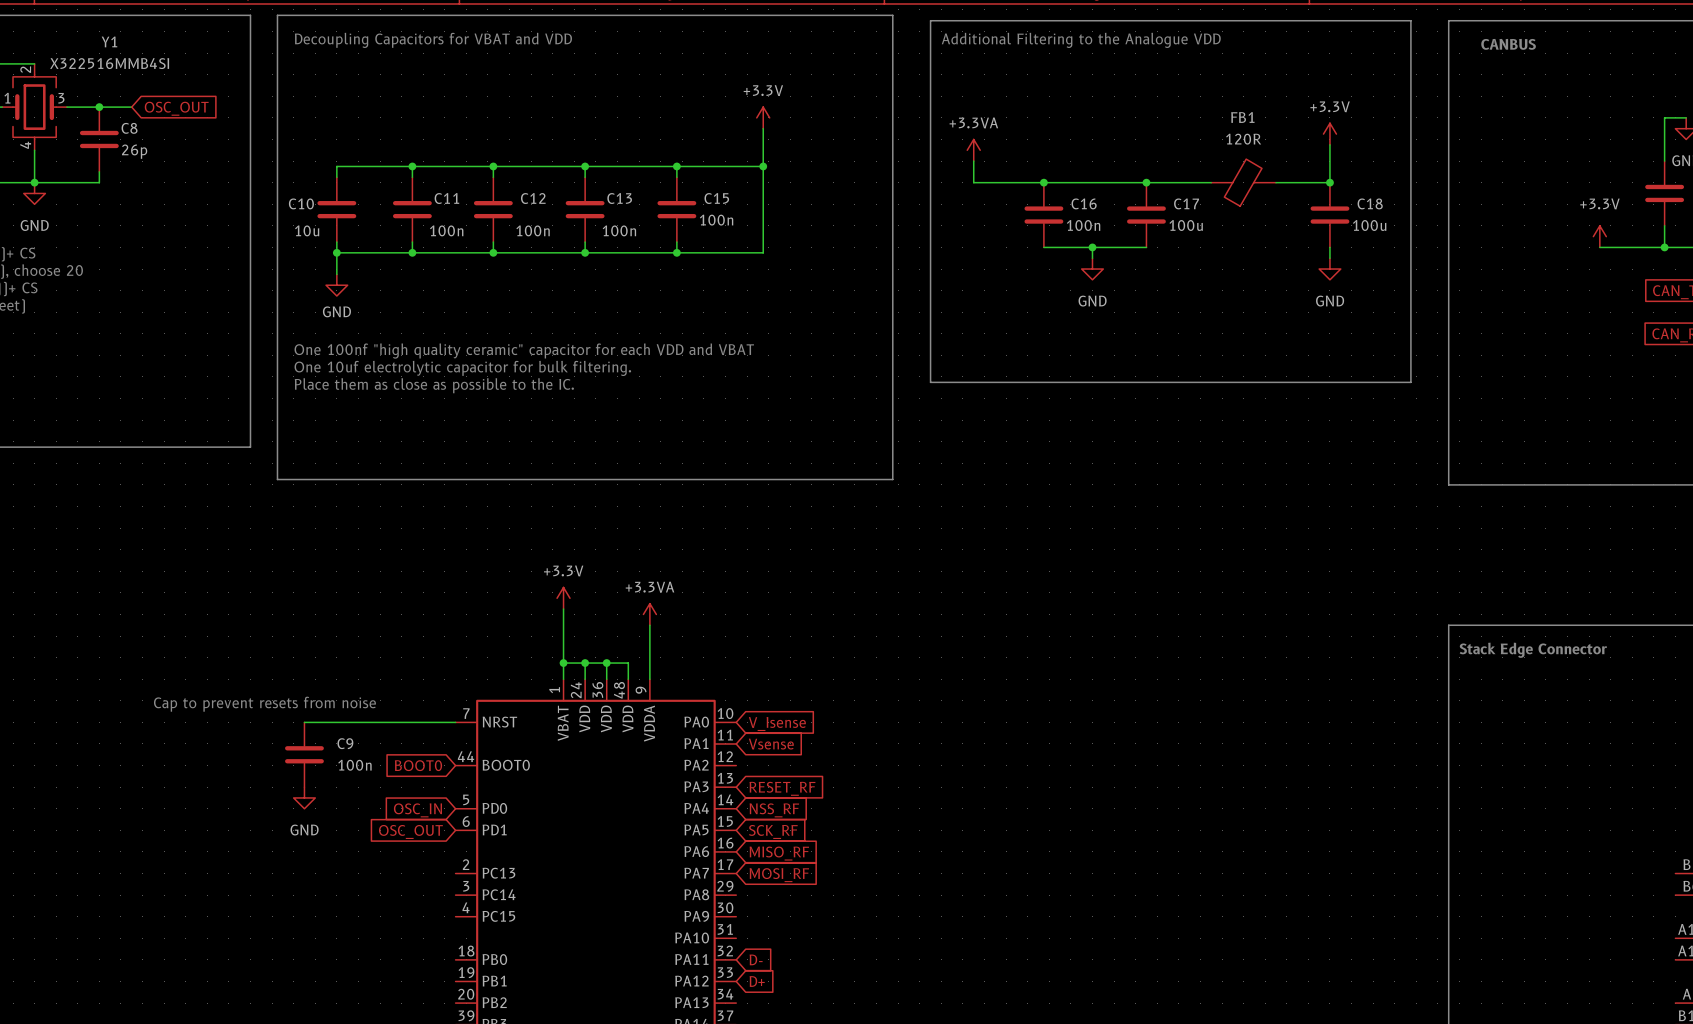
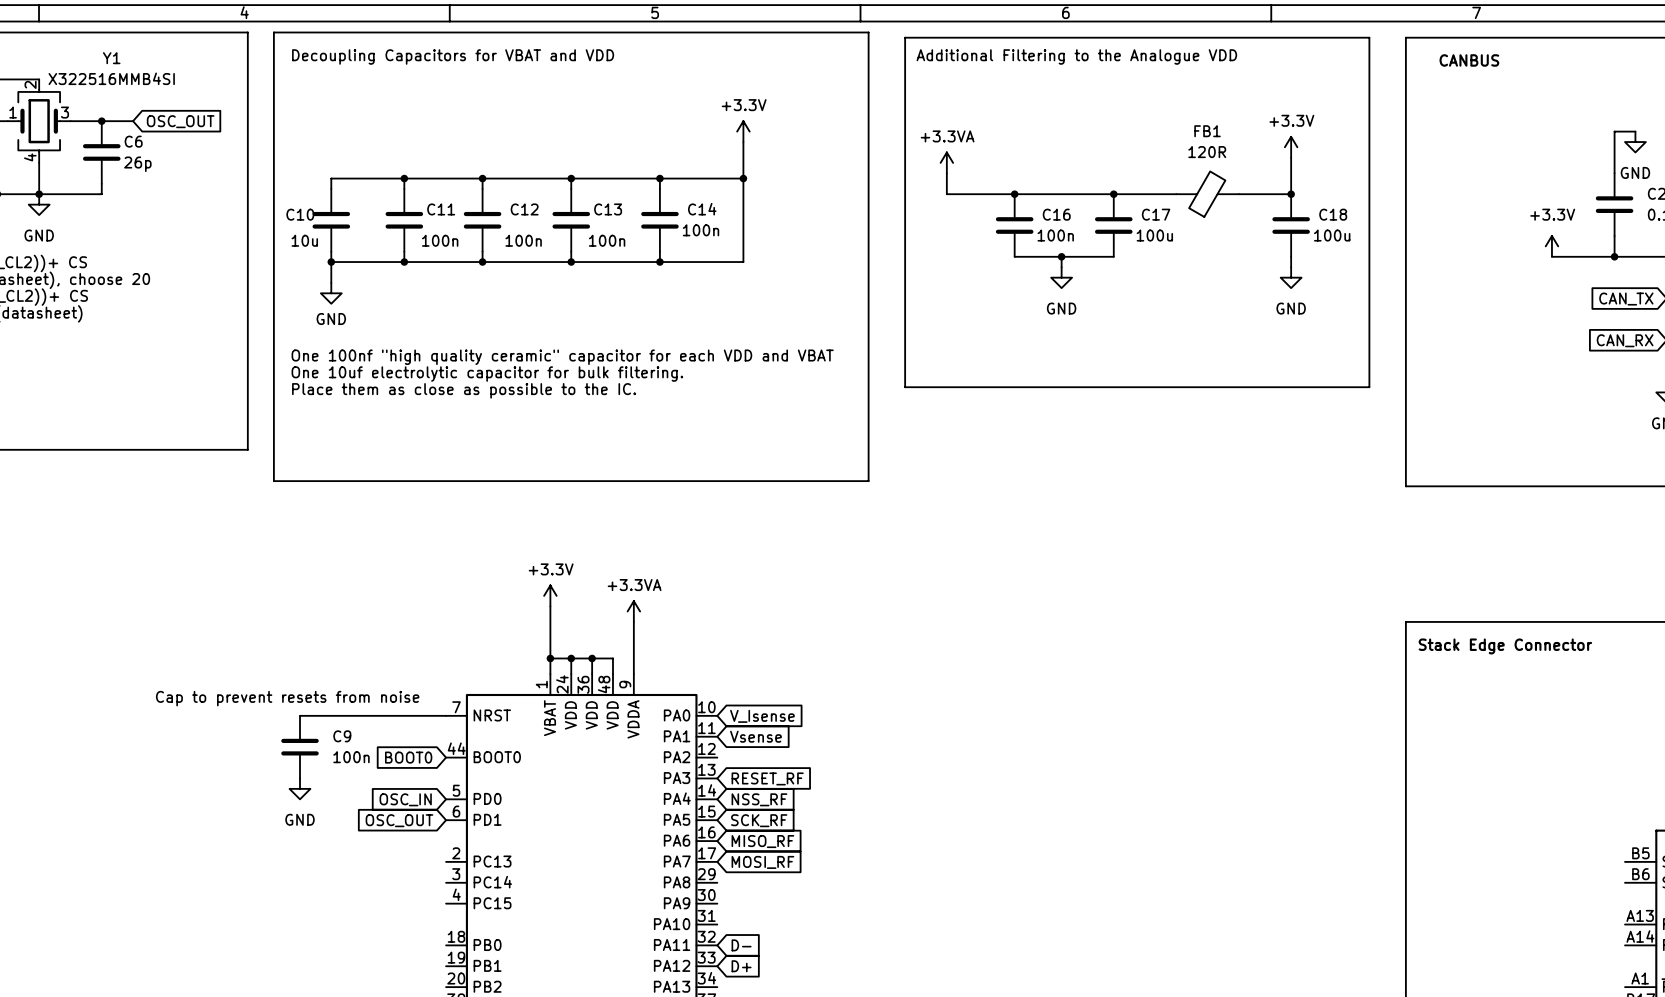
C8 name: C8 (129, 128) -> C6 (133, 141)
C15 name: C15 (716, 198) -> C14 (702, 209)

